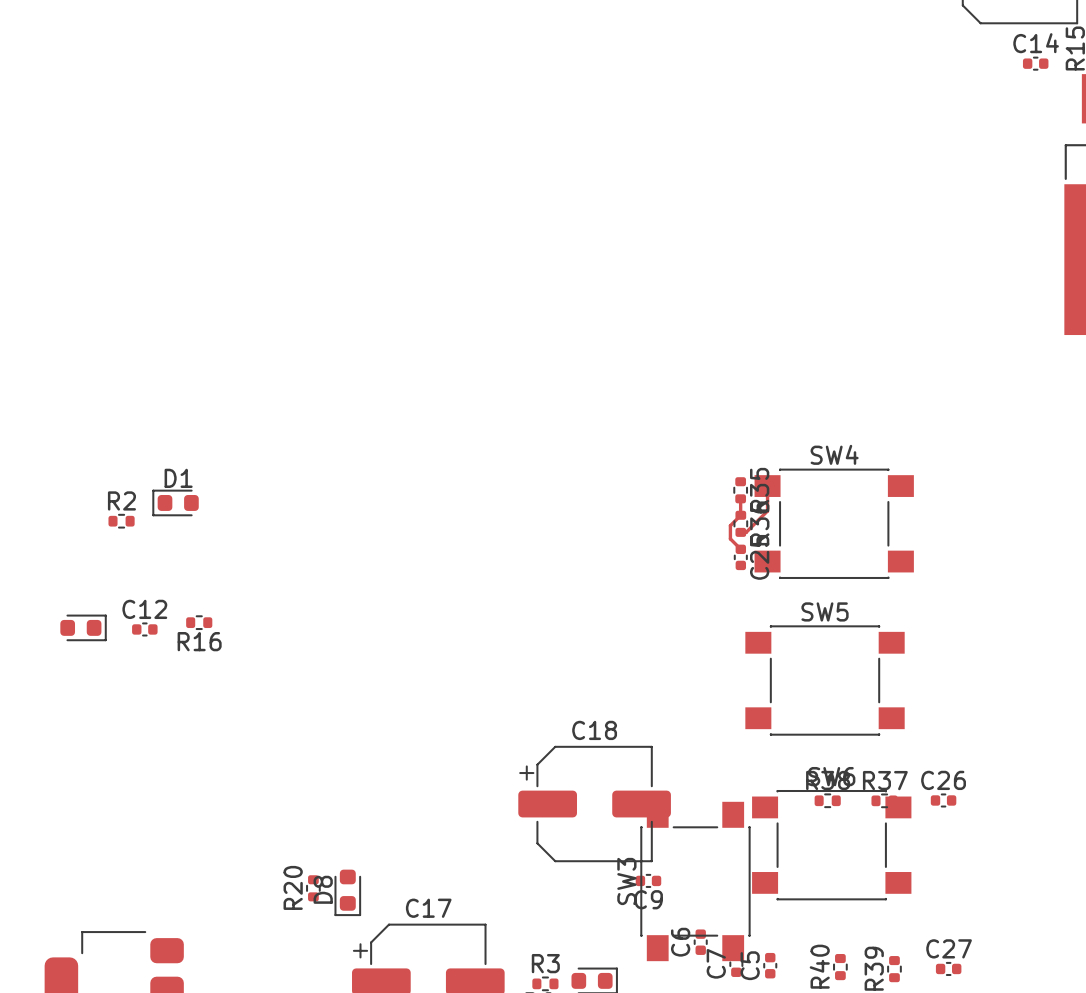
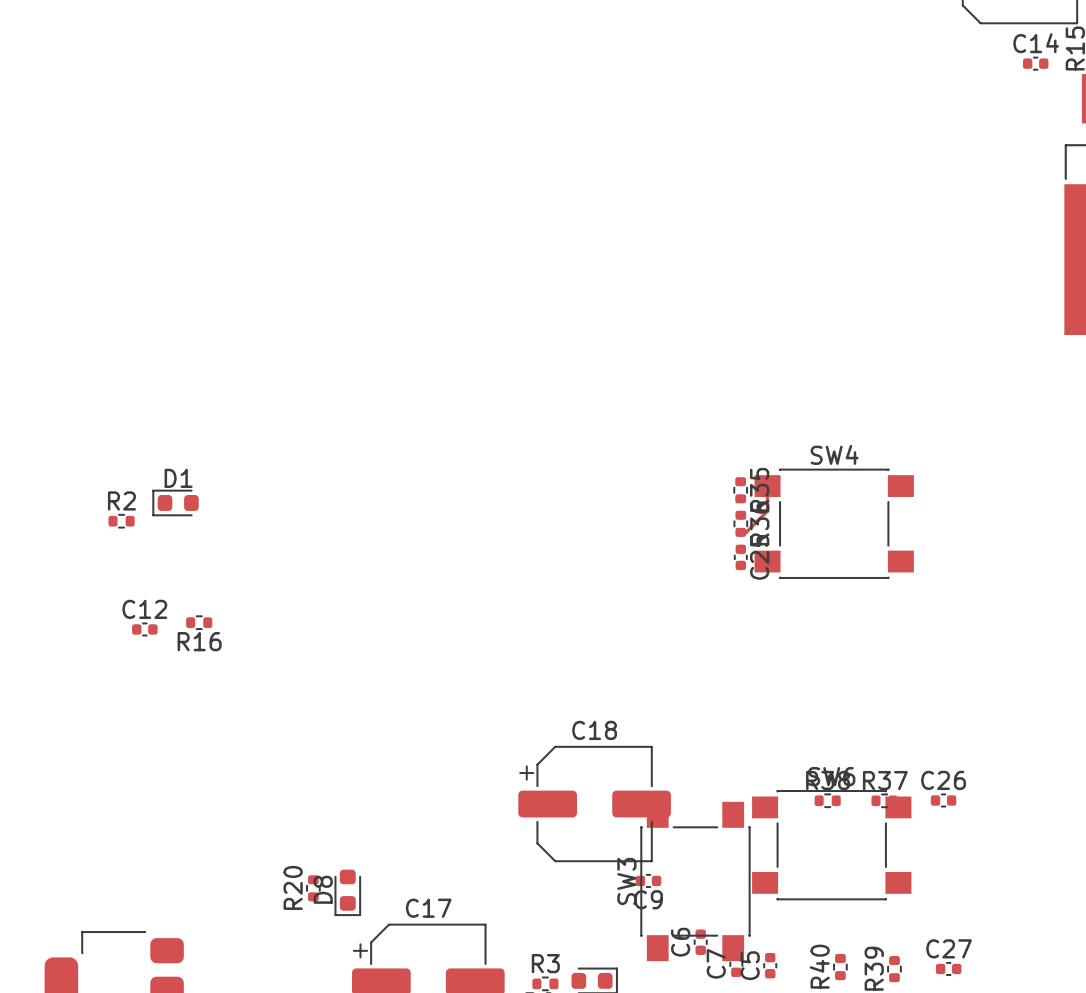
track: (740, 498) (740, 515) -> none
track: (740, 515) (730, 525) (730, 538) (740, 549) -> none
part: (83, 627) -> none
SW5: (825, 680) -> none

